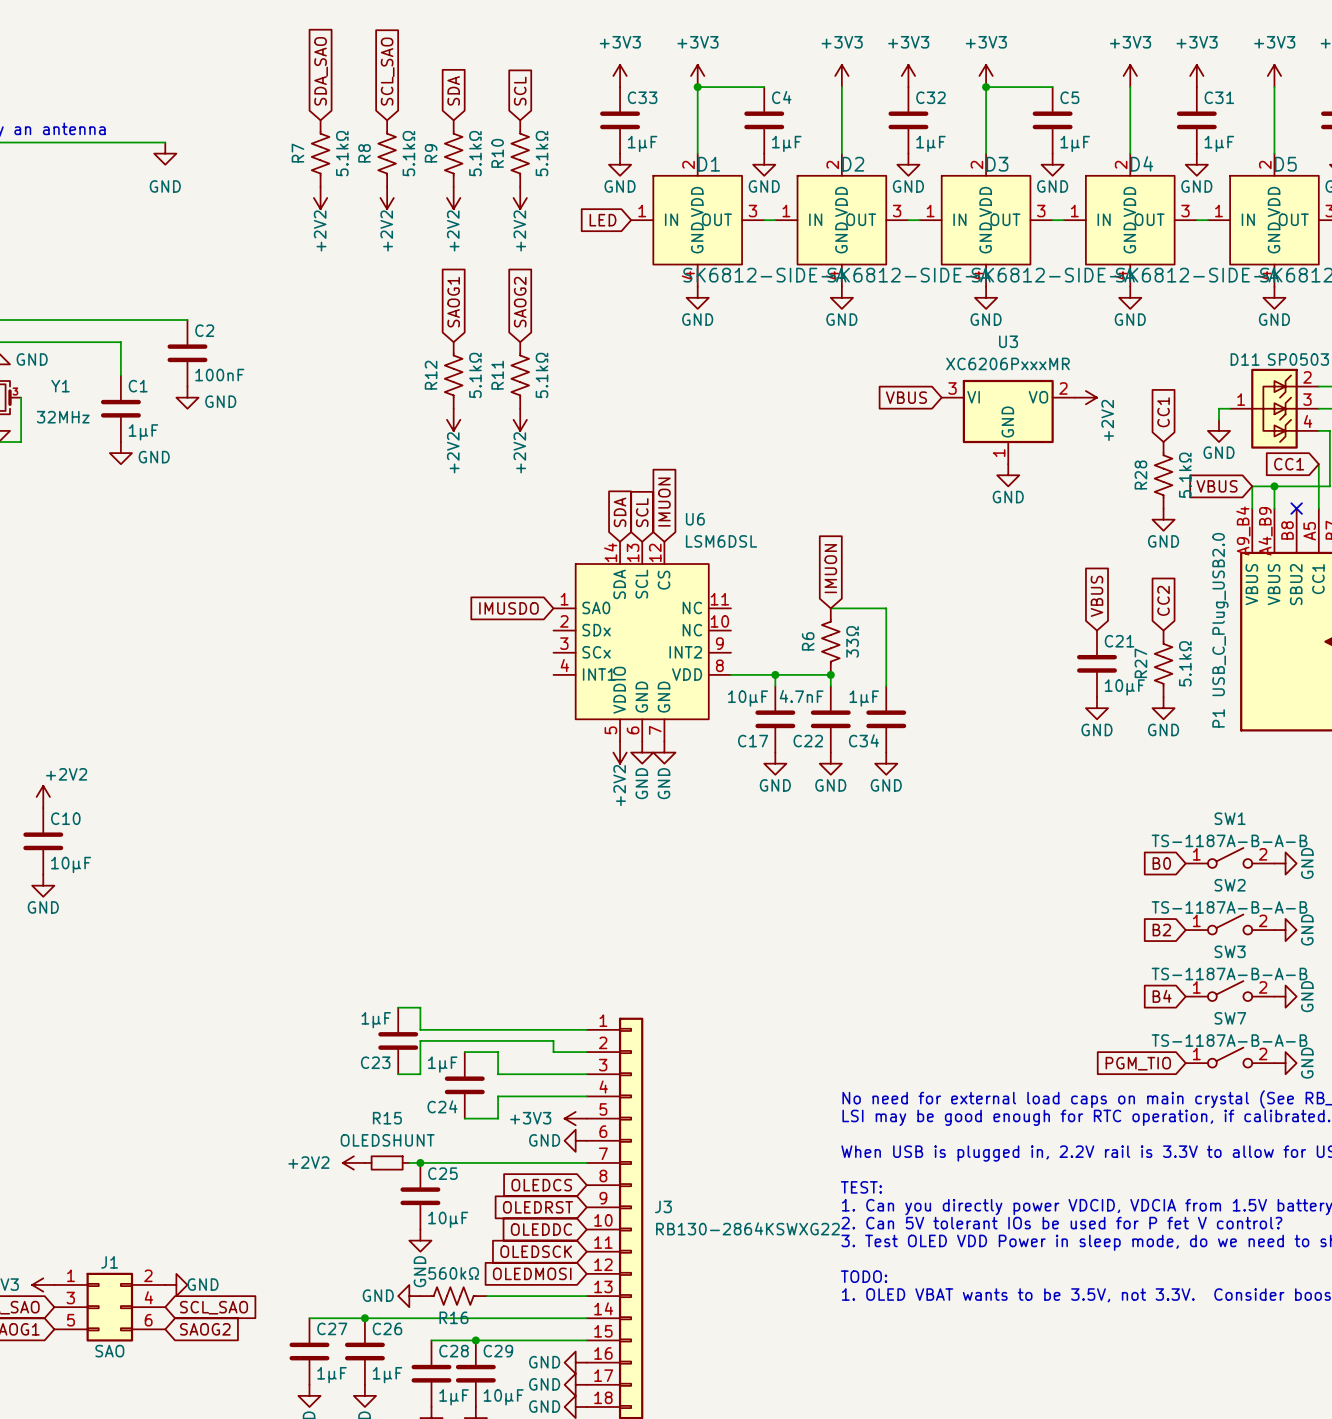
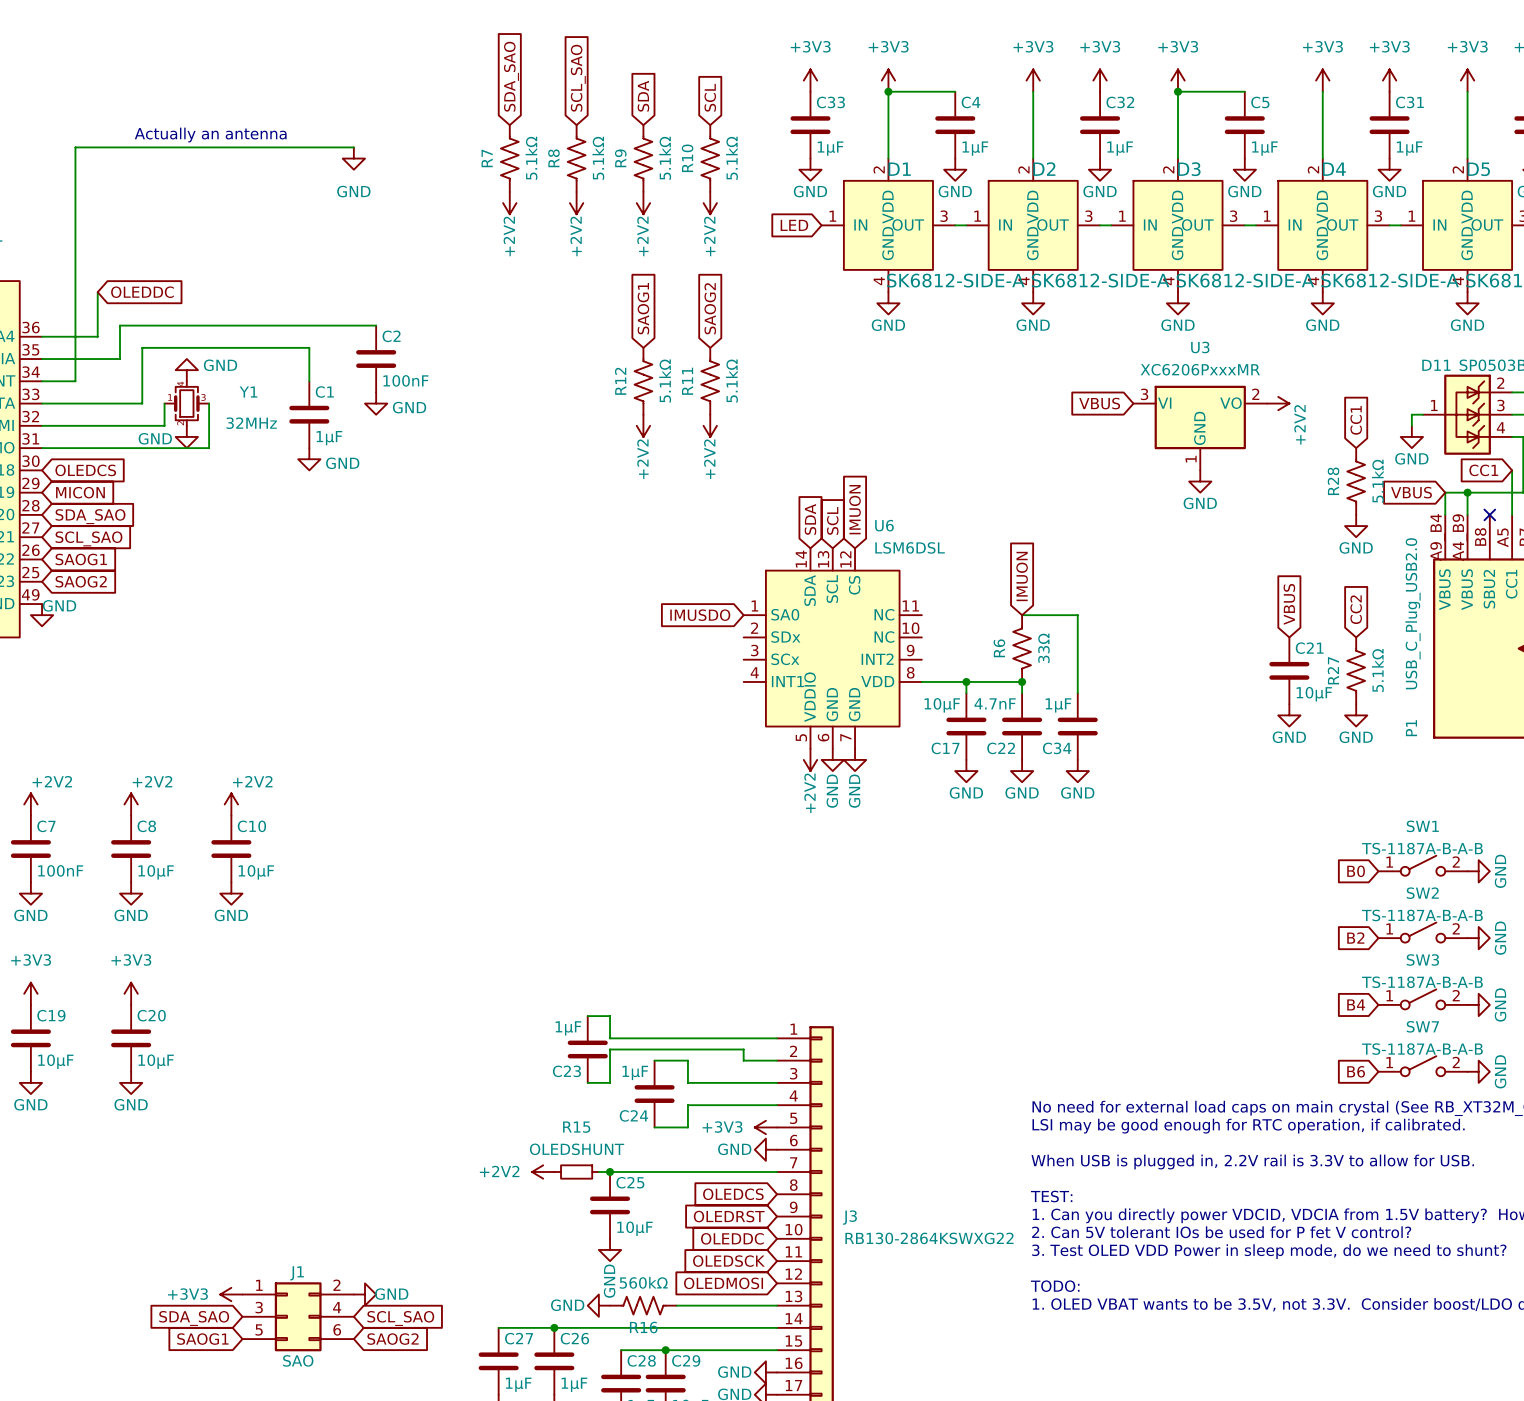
global label: PGM_TIO (1138, 1063) -> B6 (1356, 1071)

